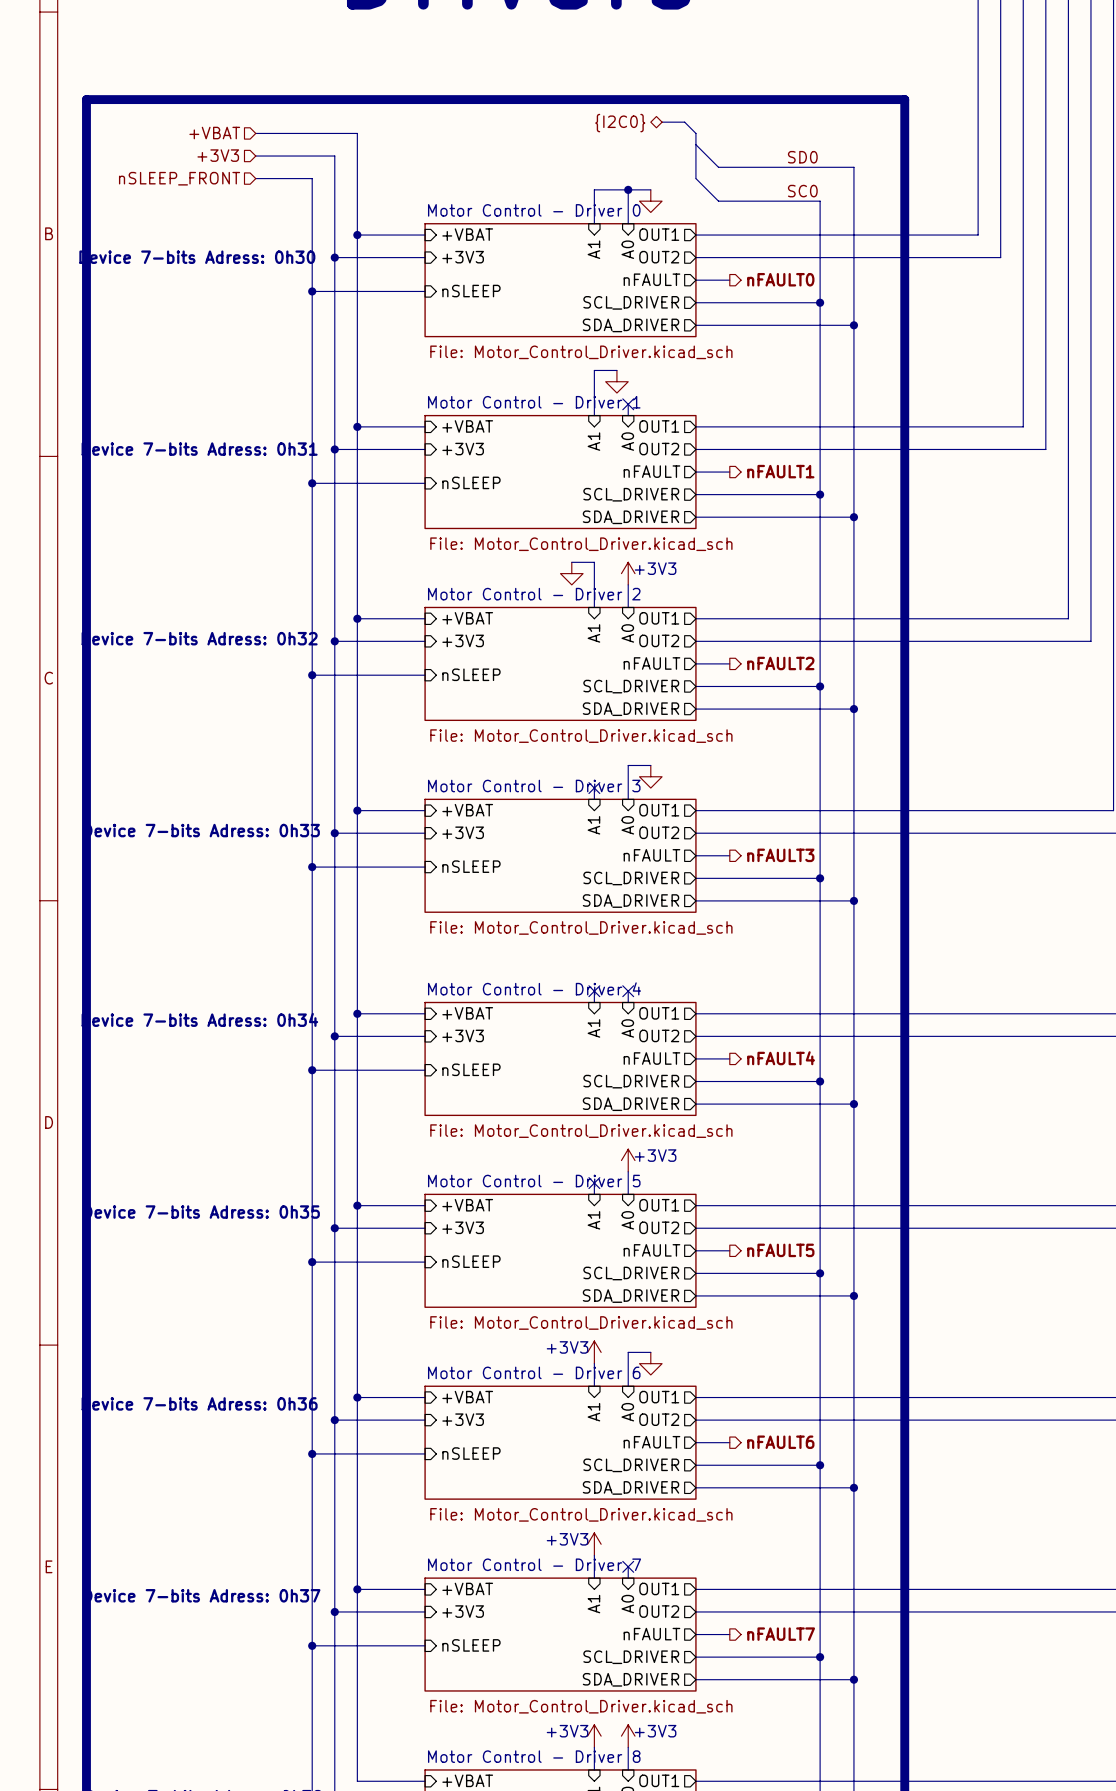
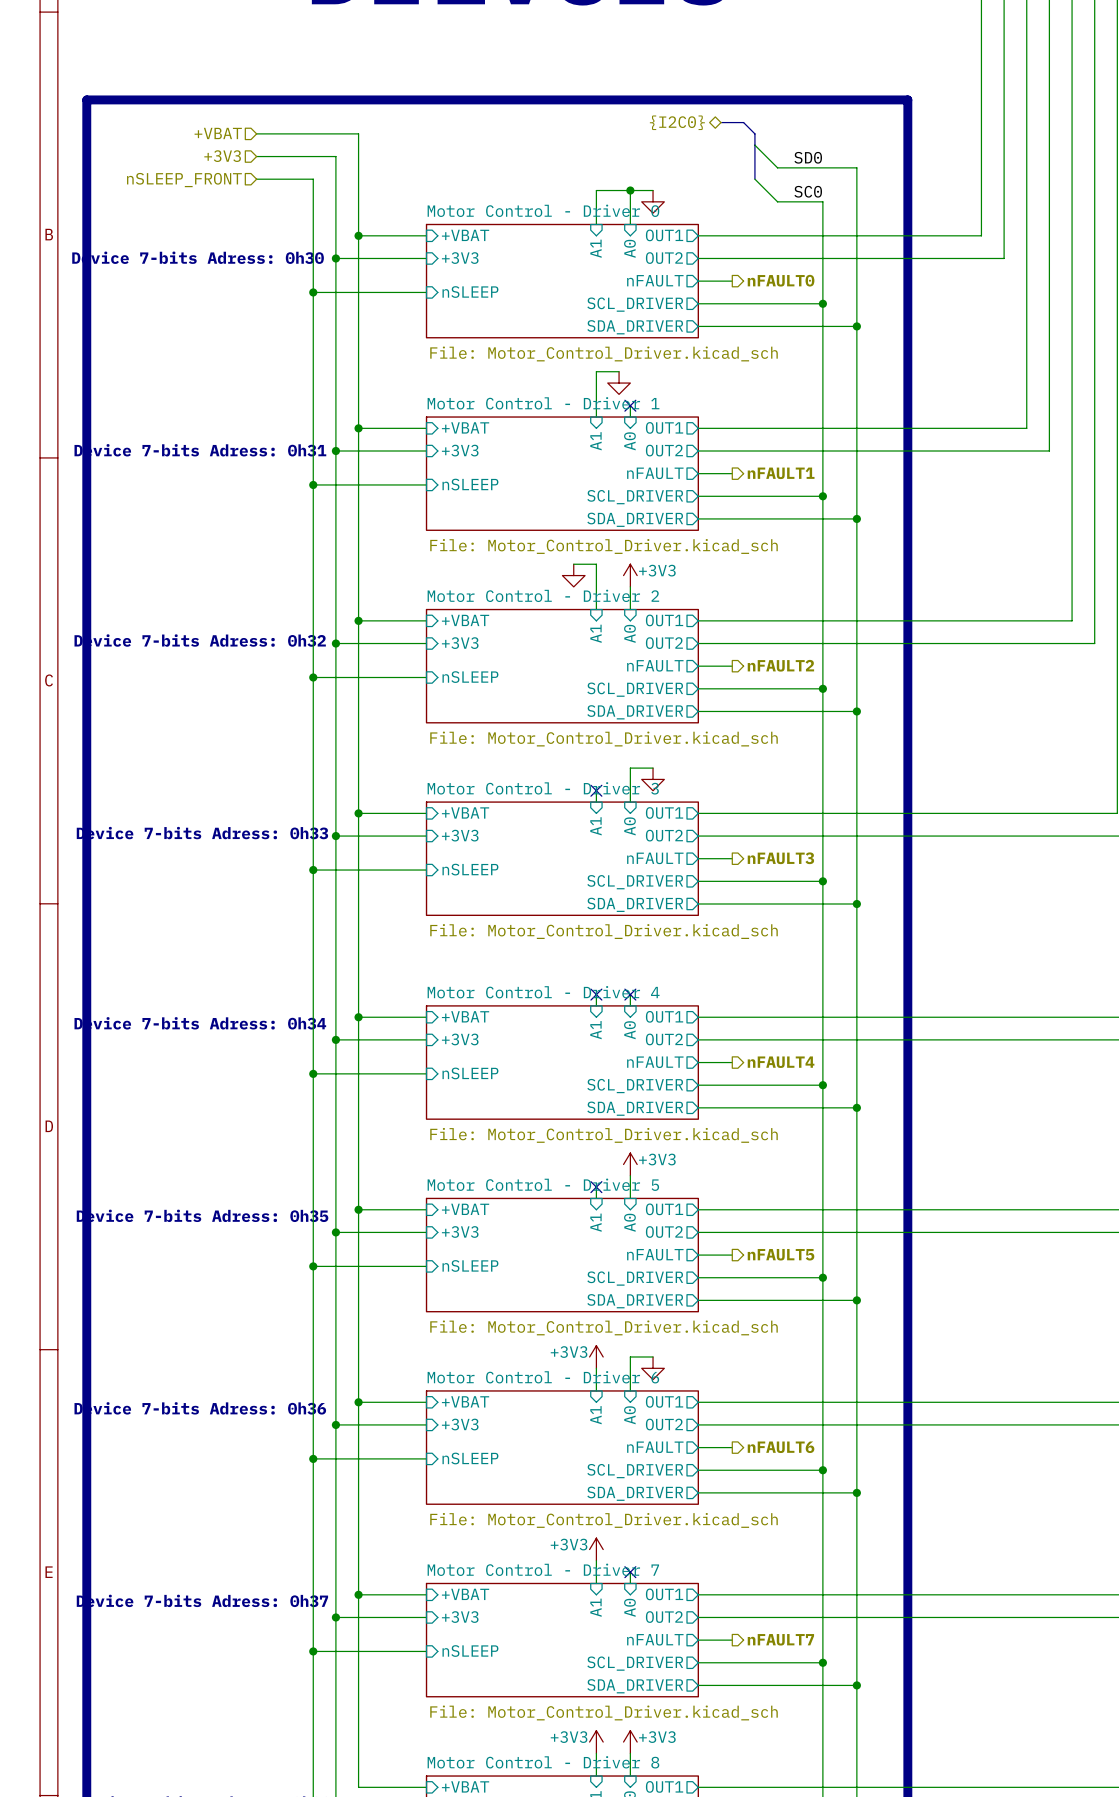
bus: (662, 122) (684, 122) (695, 133) (695, 178) -> (720, 122) (743, 122) (754, 133) (754, 179)
hierarchical label position: {I2C0} (620, 123) -> {I2C0} (677, 122)
wire: (695, 144) (718, 167) (774, 167) -> (754, 145) (777, 167)
wire: (695, 178) (718, 201) (774, 201) -> (754, 179) (777, 201)

